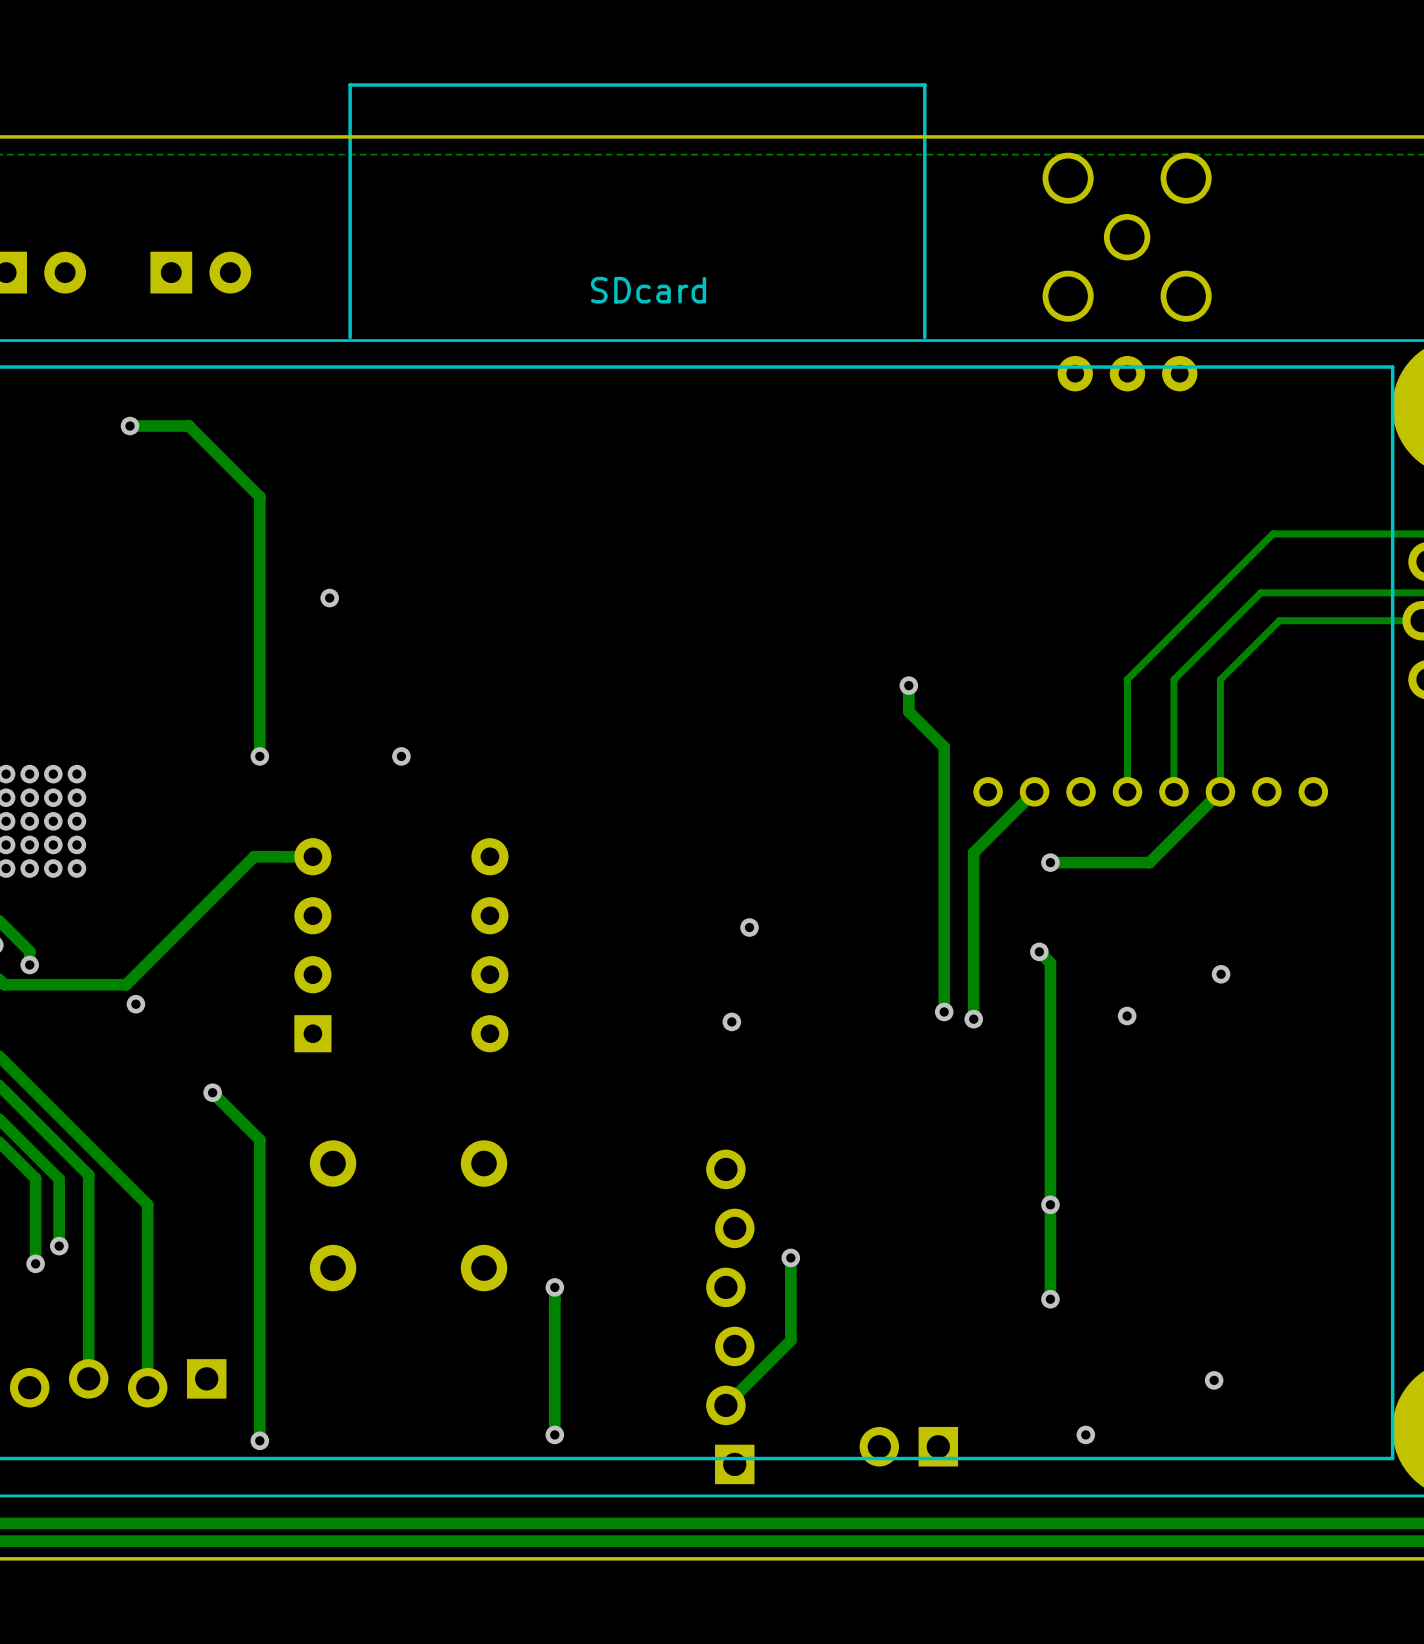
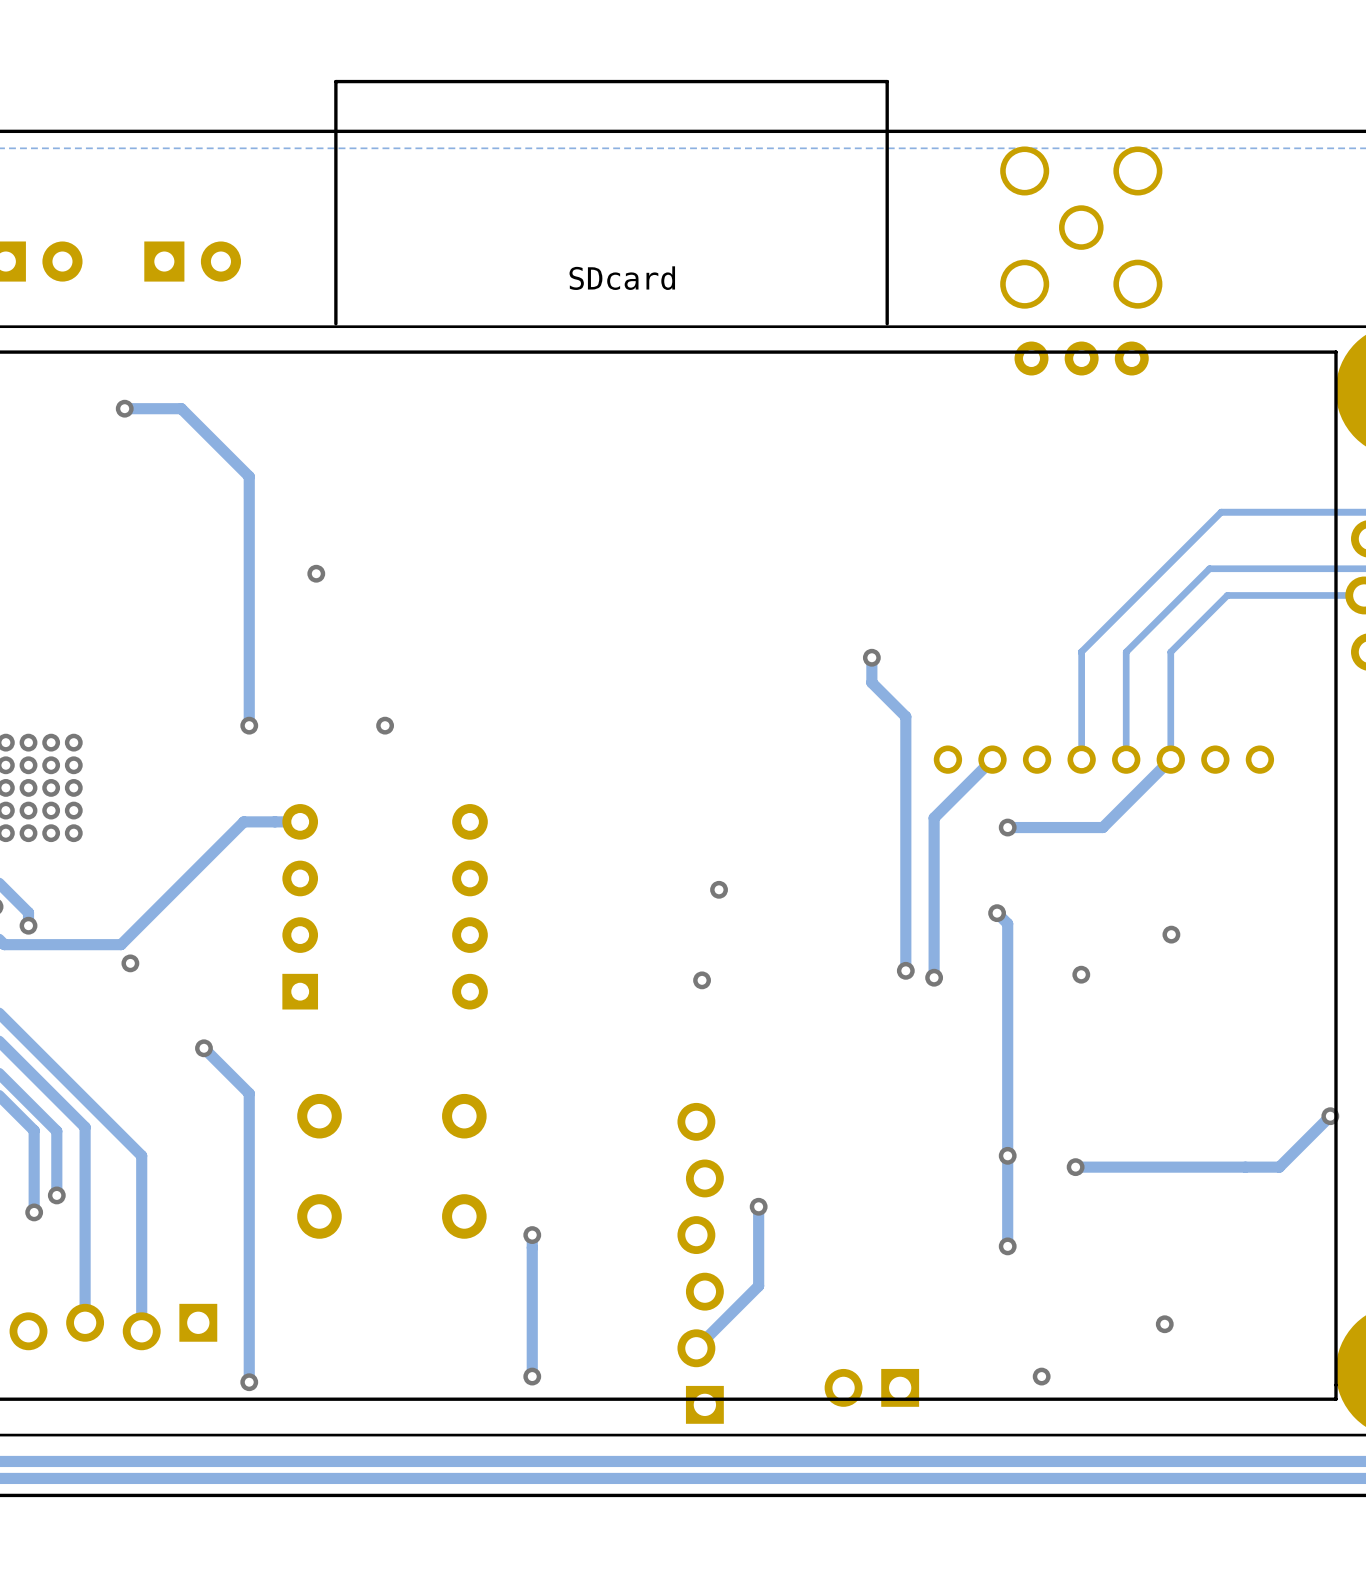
track: none -> (1330, 1116) (1279, 1167) (1075, 1167)
via: none -> (1330, 1116)
via: none -> (1075, 1167)

